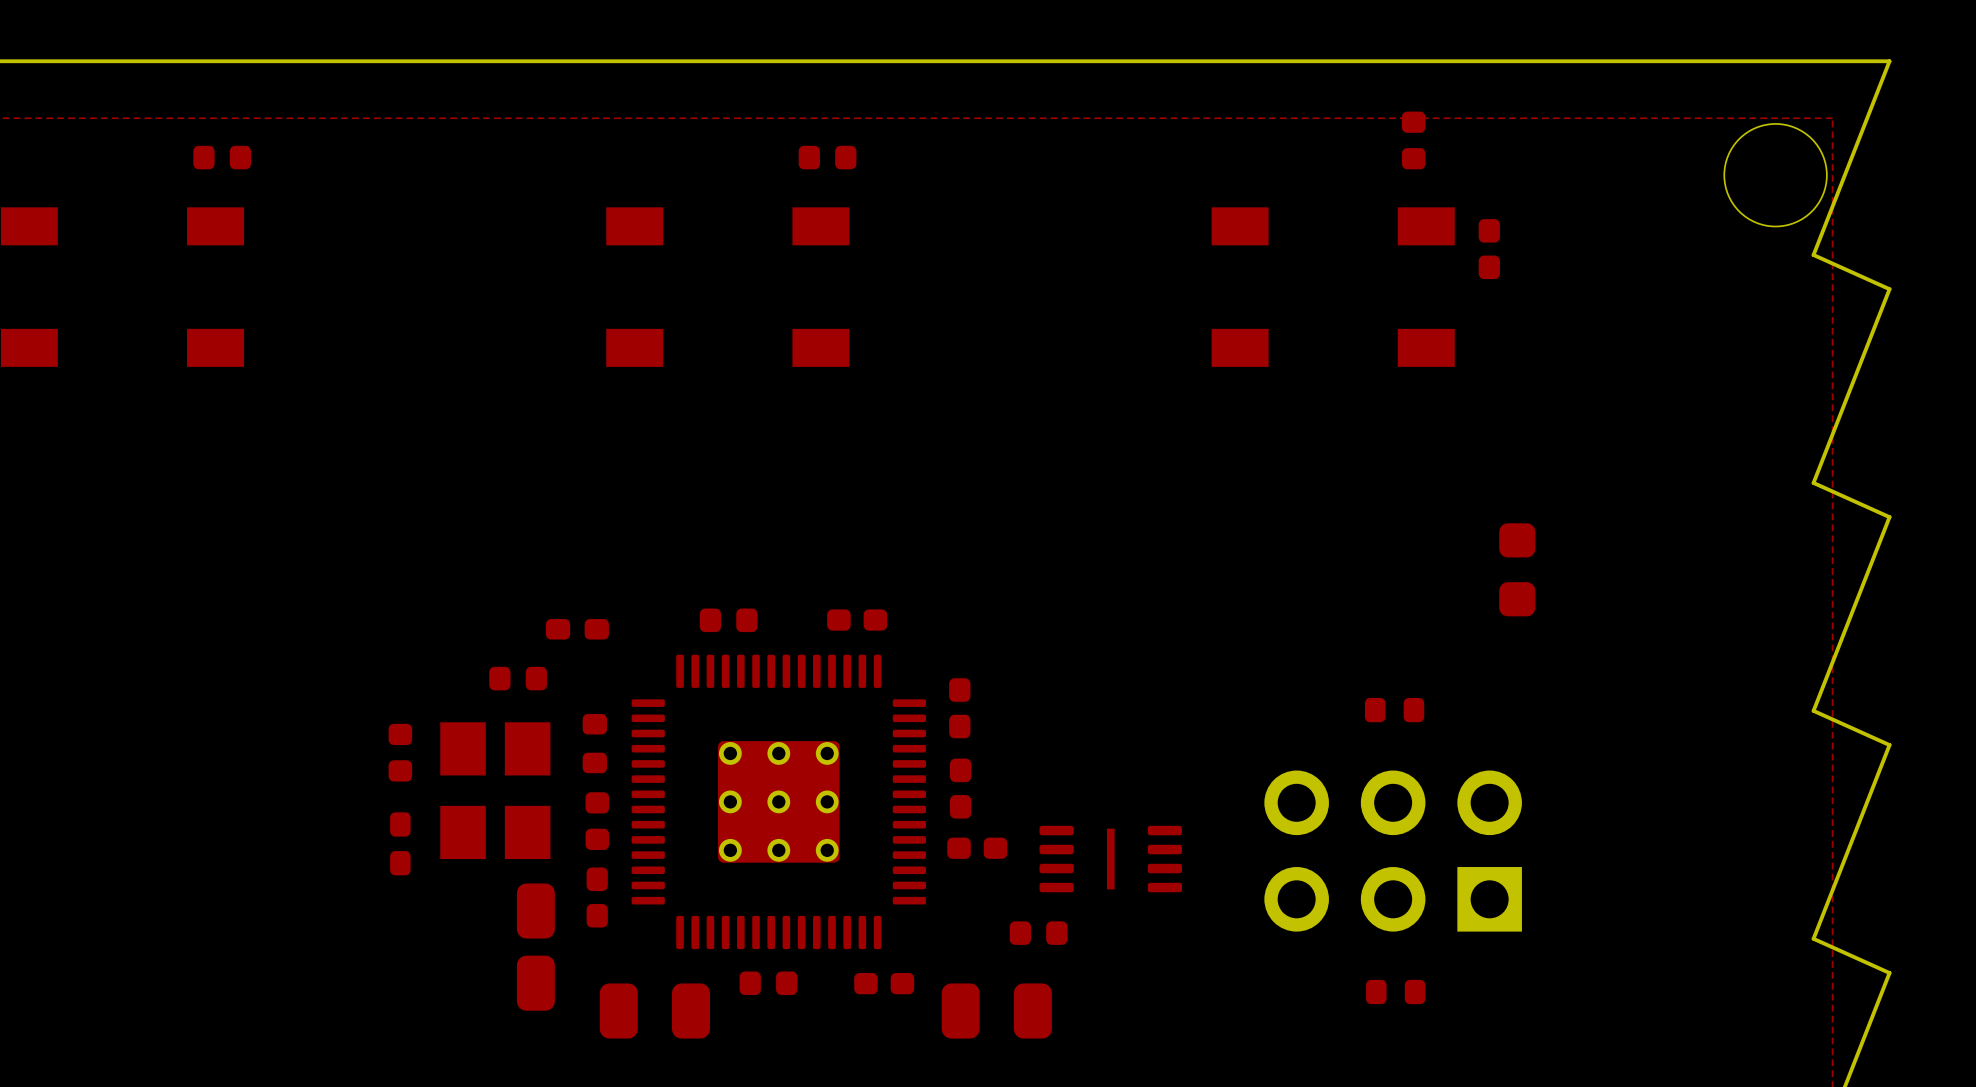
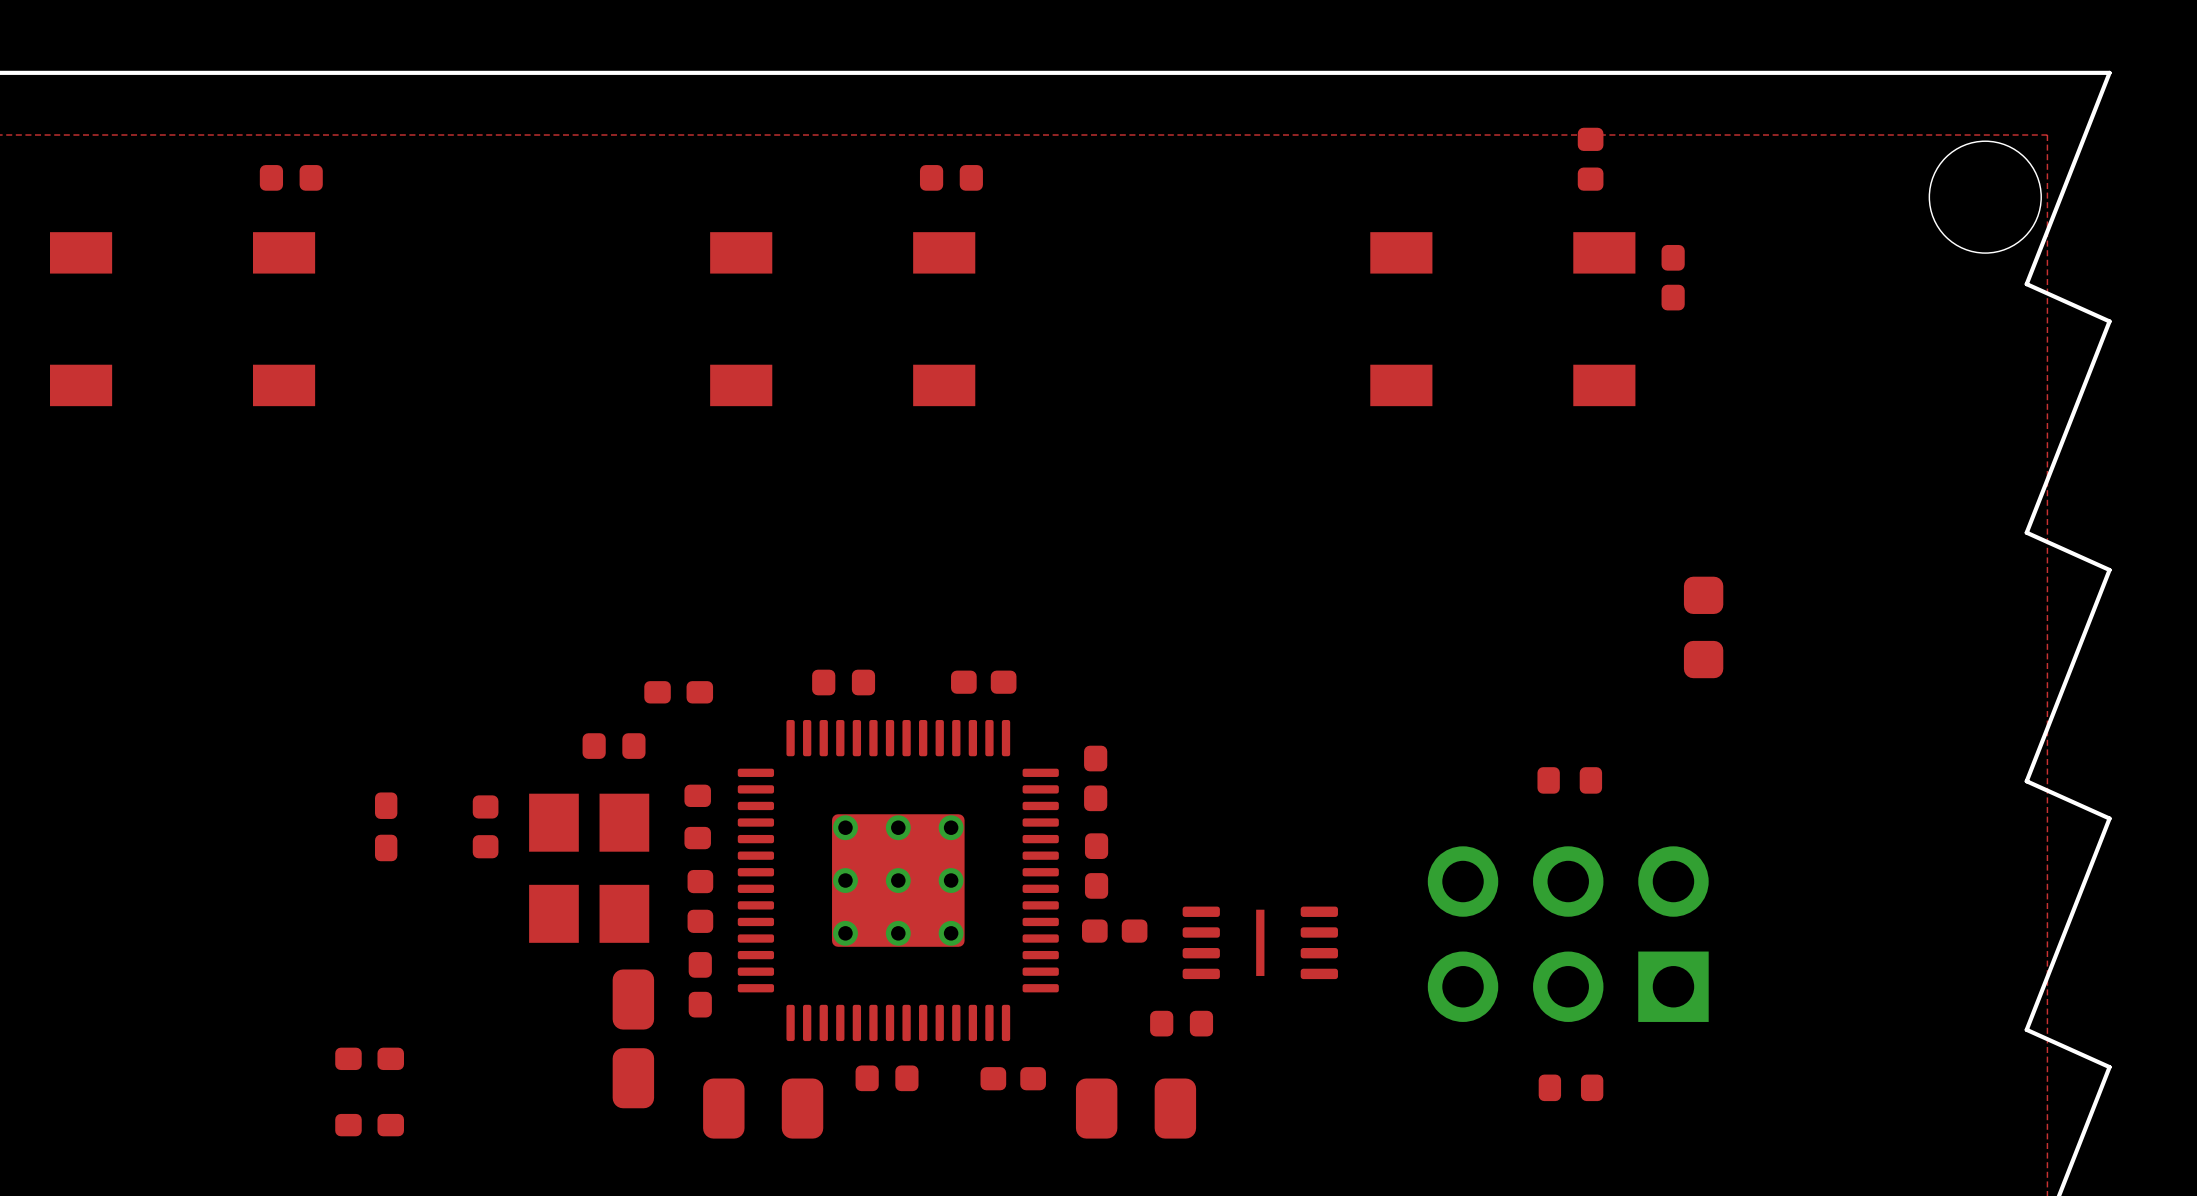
part: none -> (386, 826)
part: (400, 843) -> none
part: none -> (369, 1058)
part: none -> (369, 1125)

